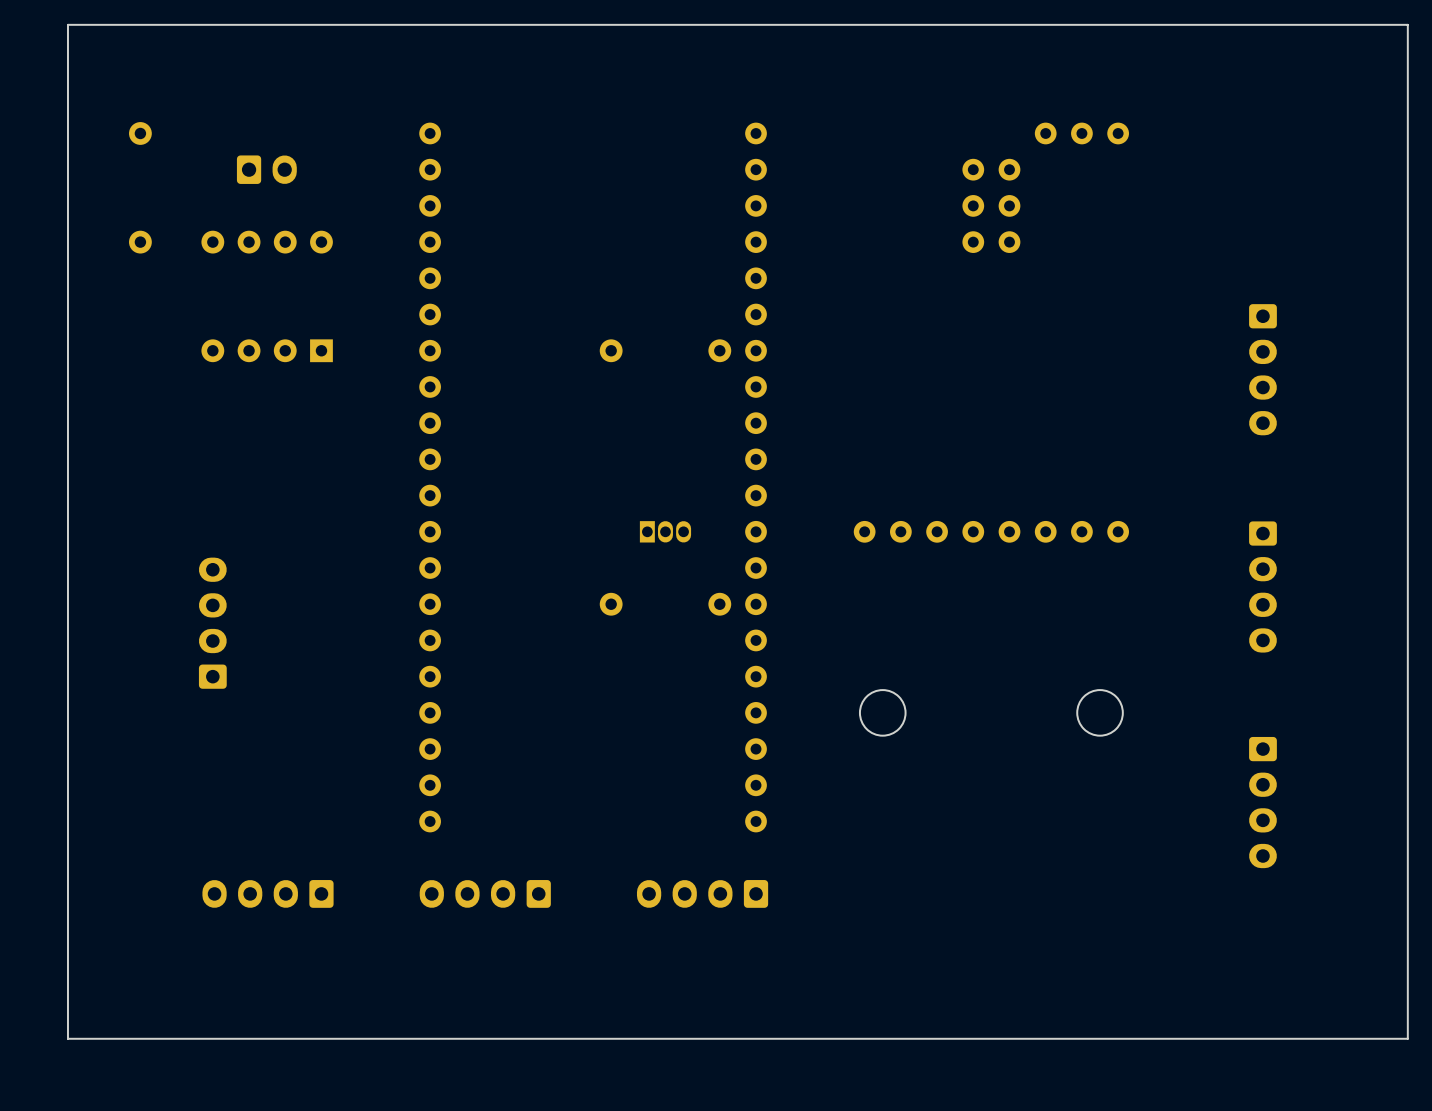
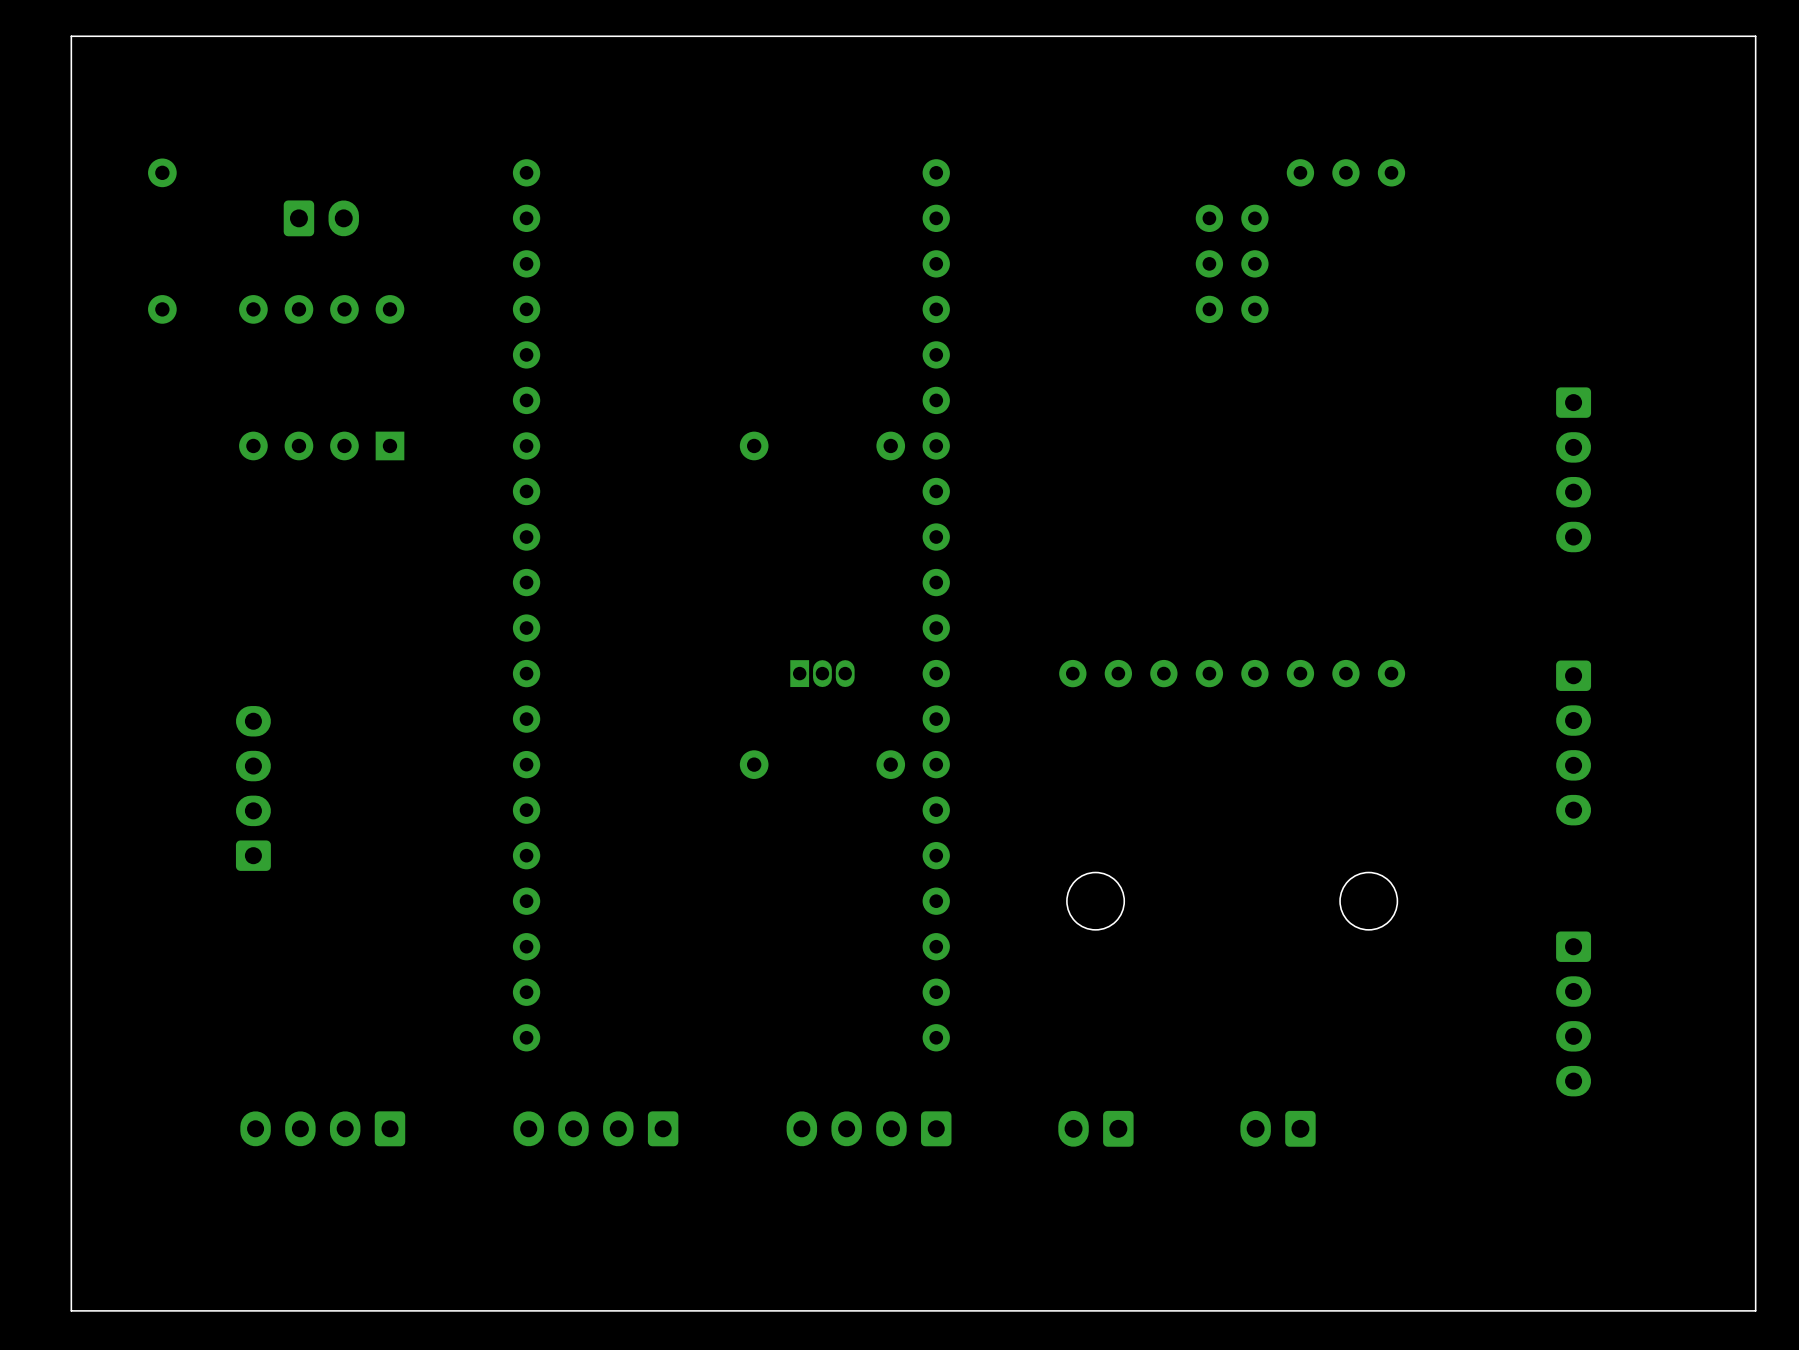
part: none -> (1095, 1128)
part: none -> (1278, 1128)

